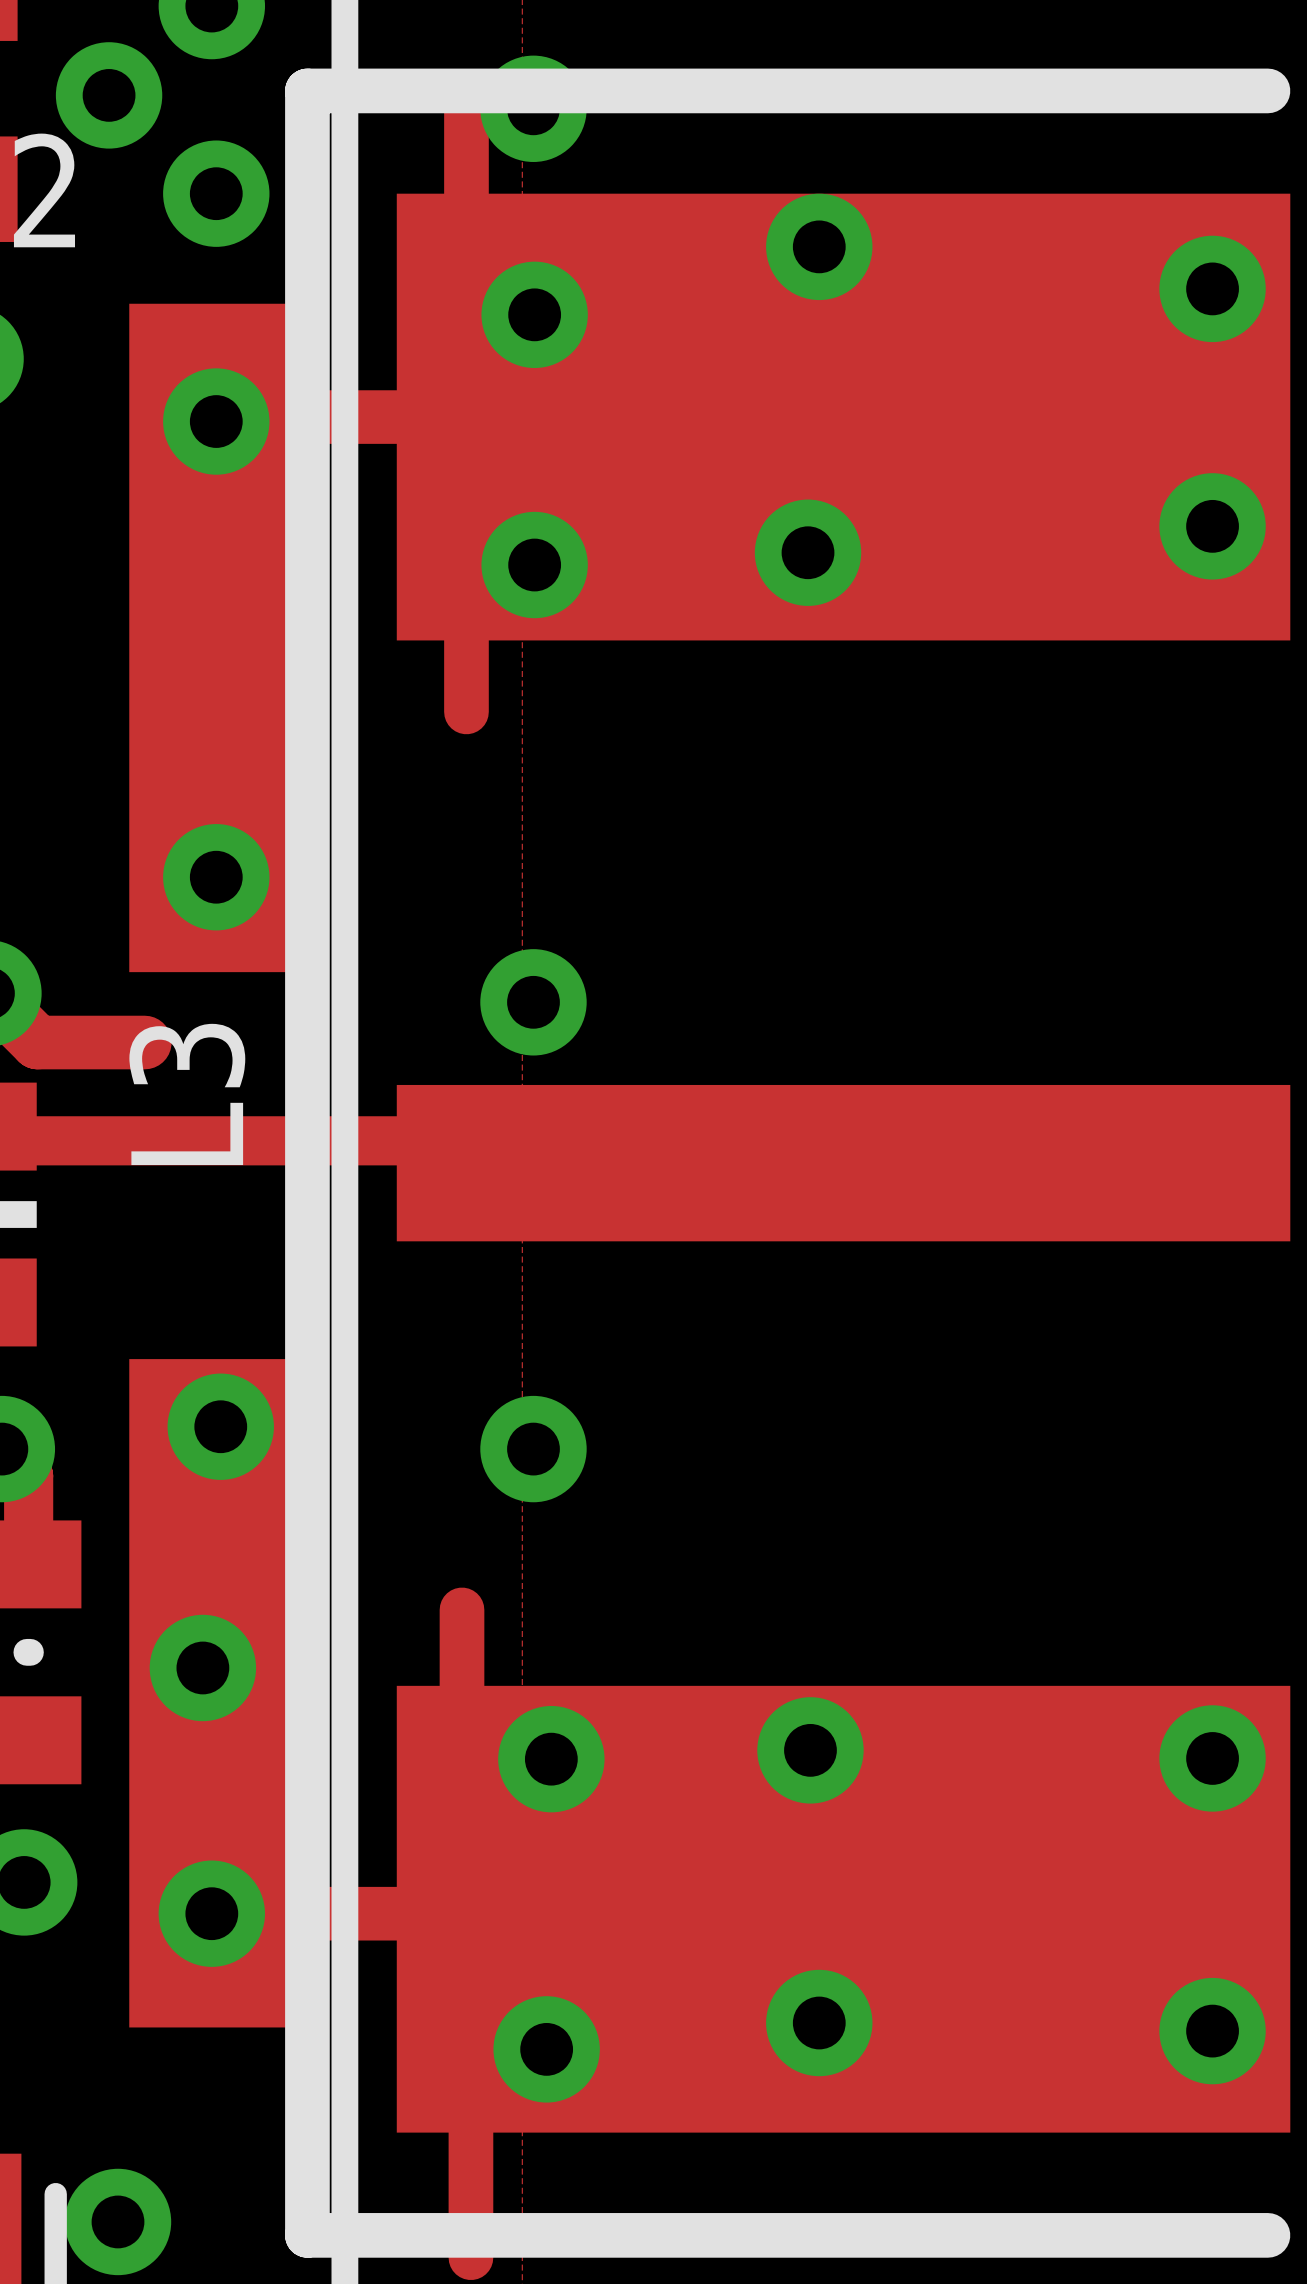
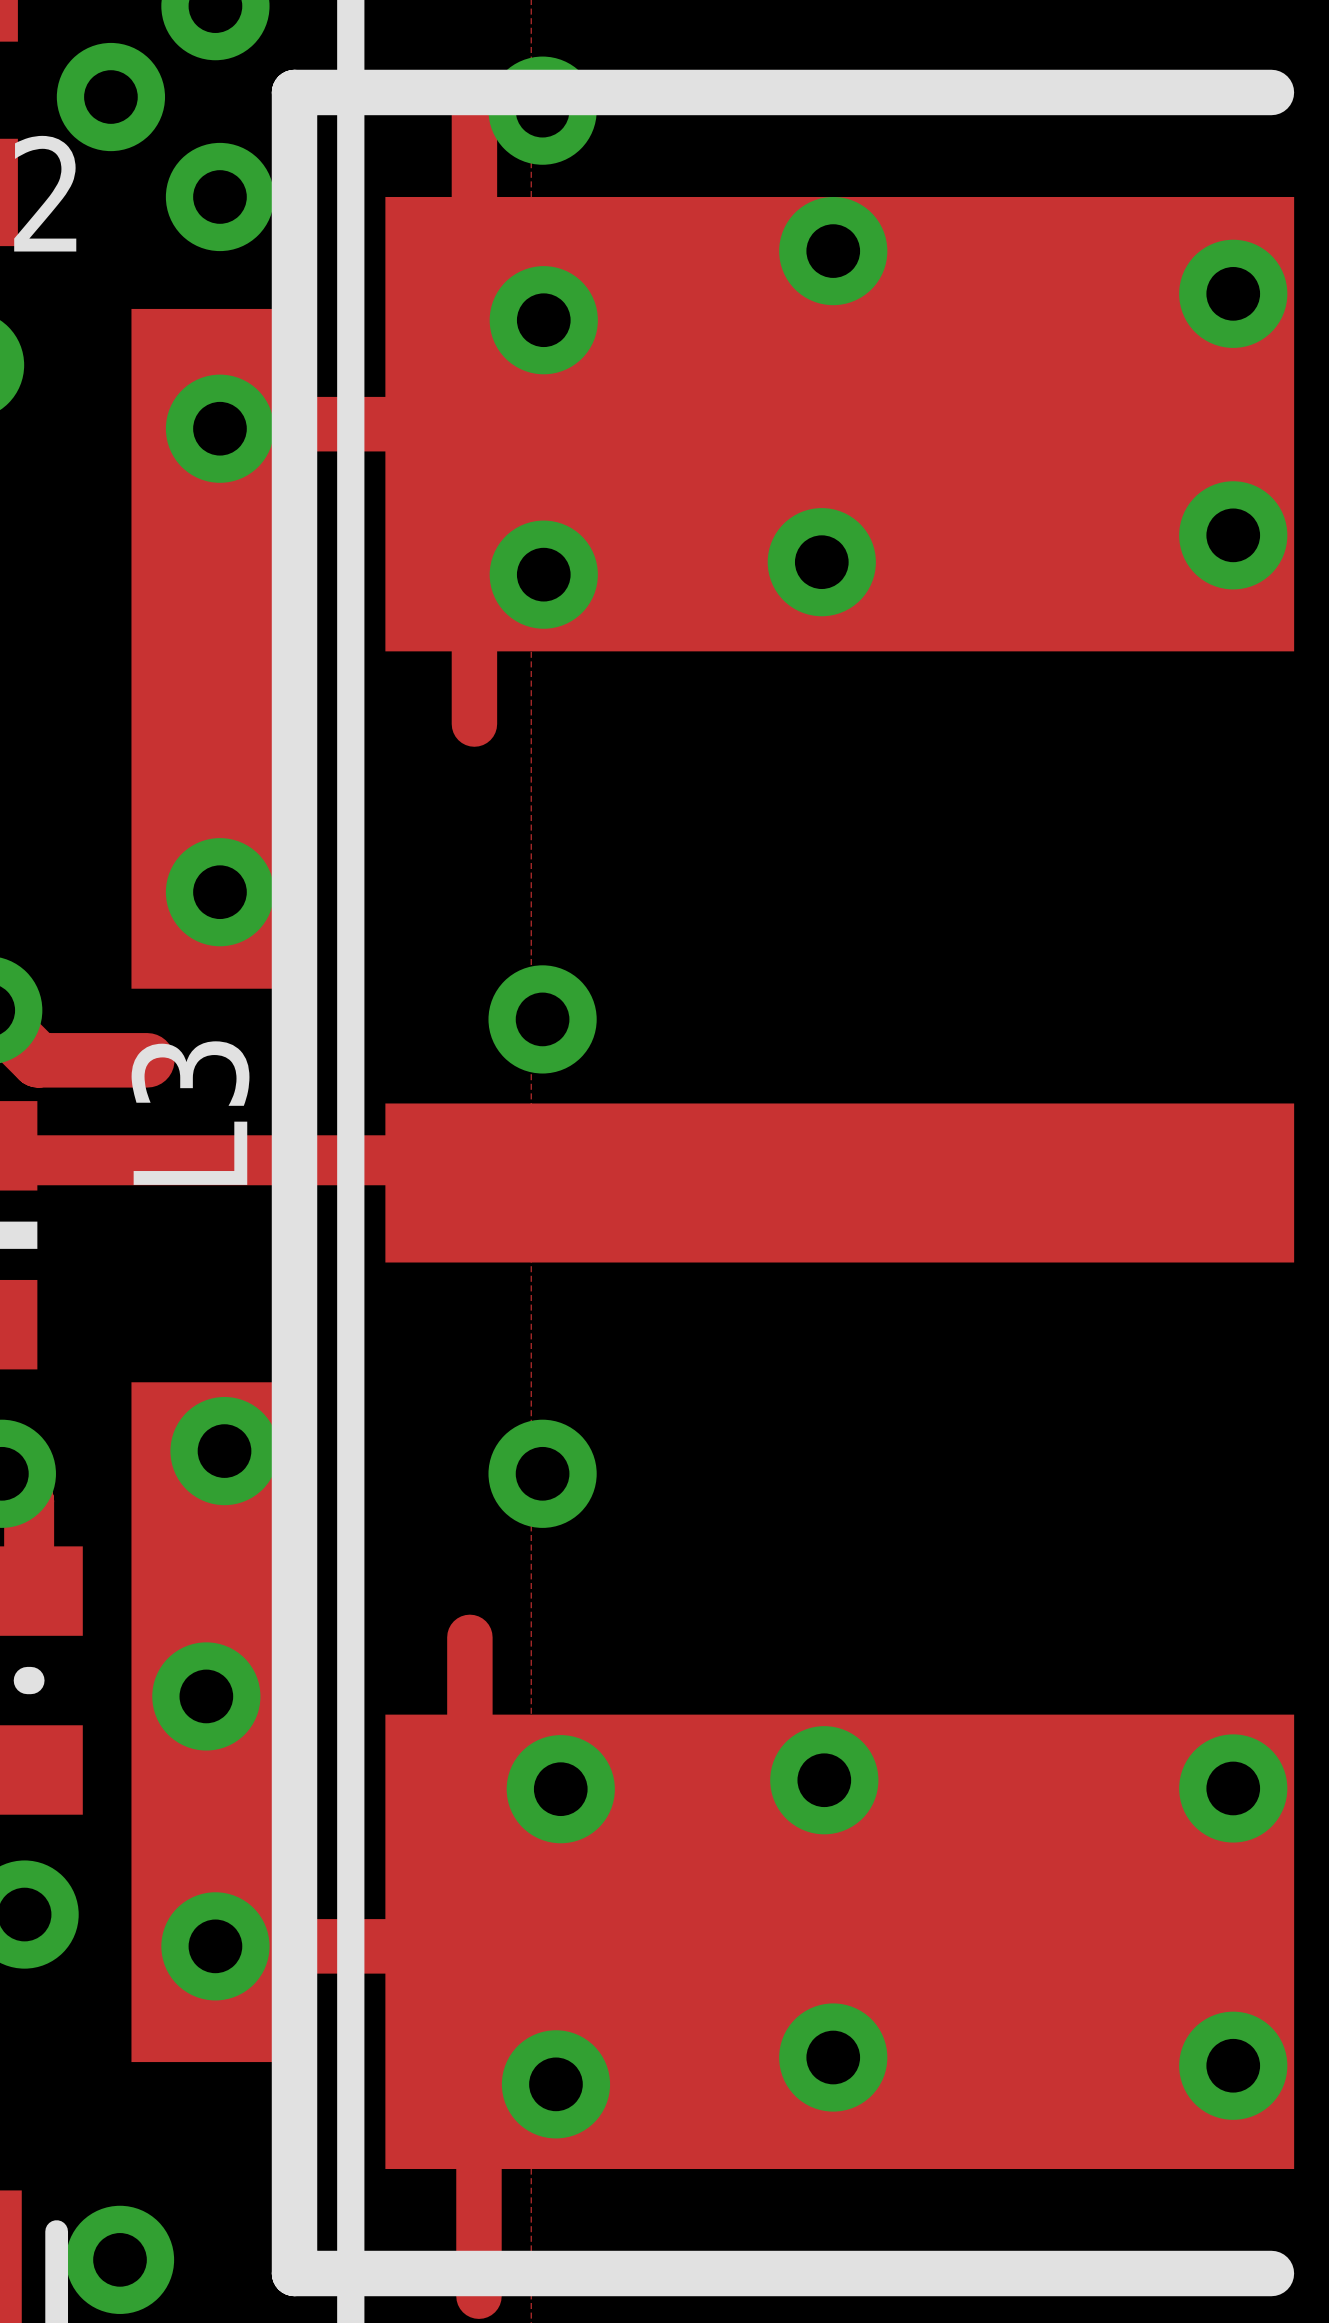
part position: (787, 1163) -> (782, 1182)

